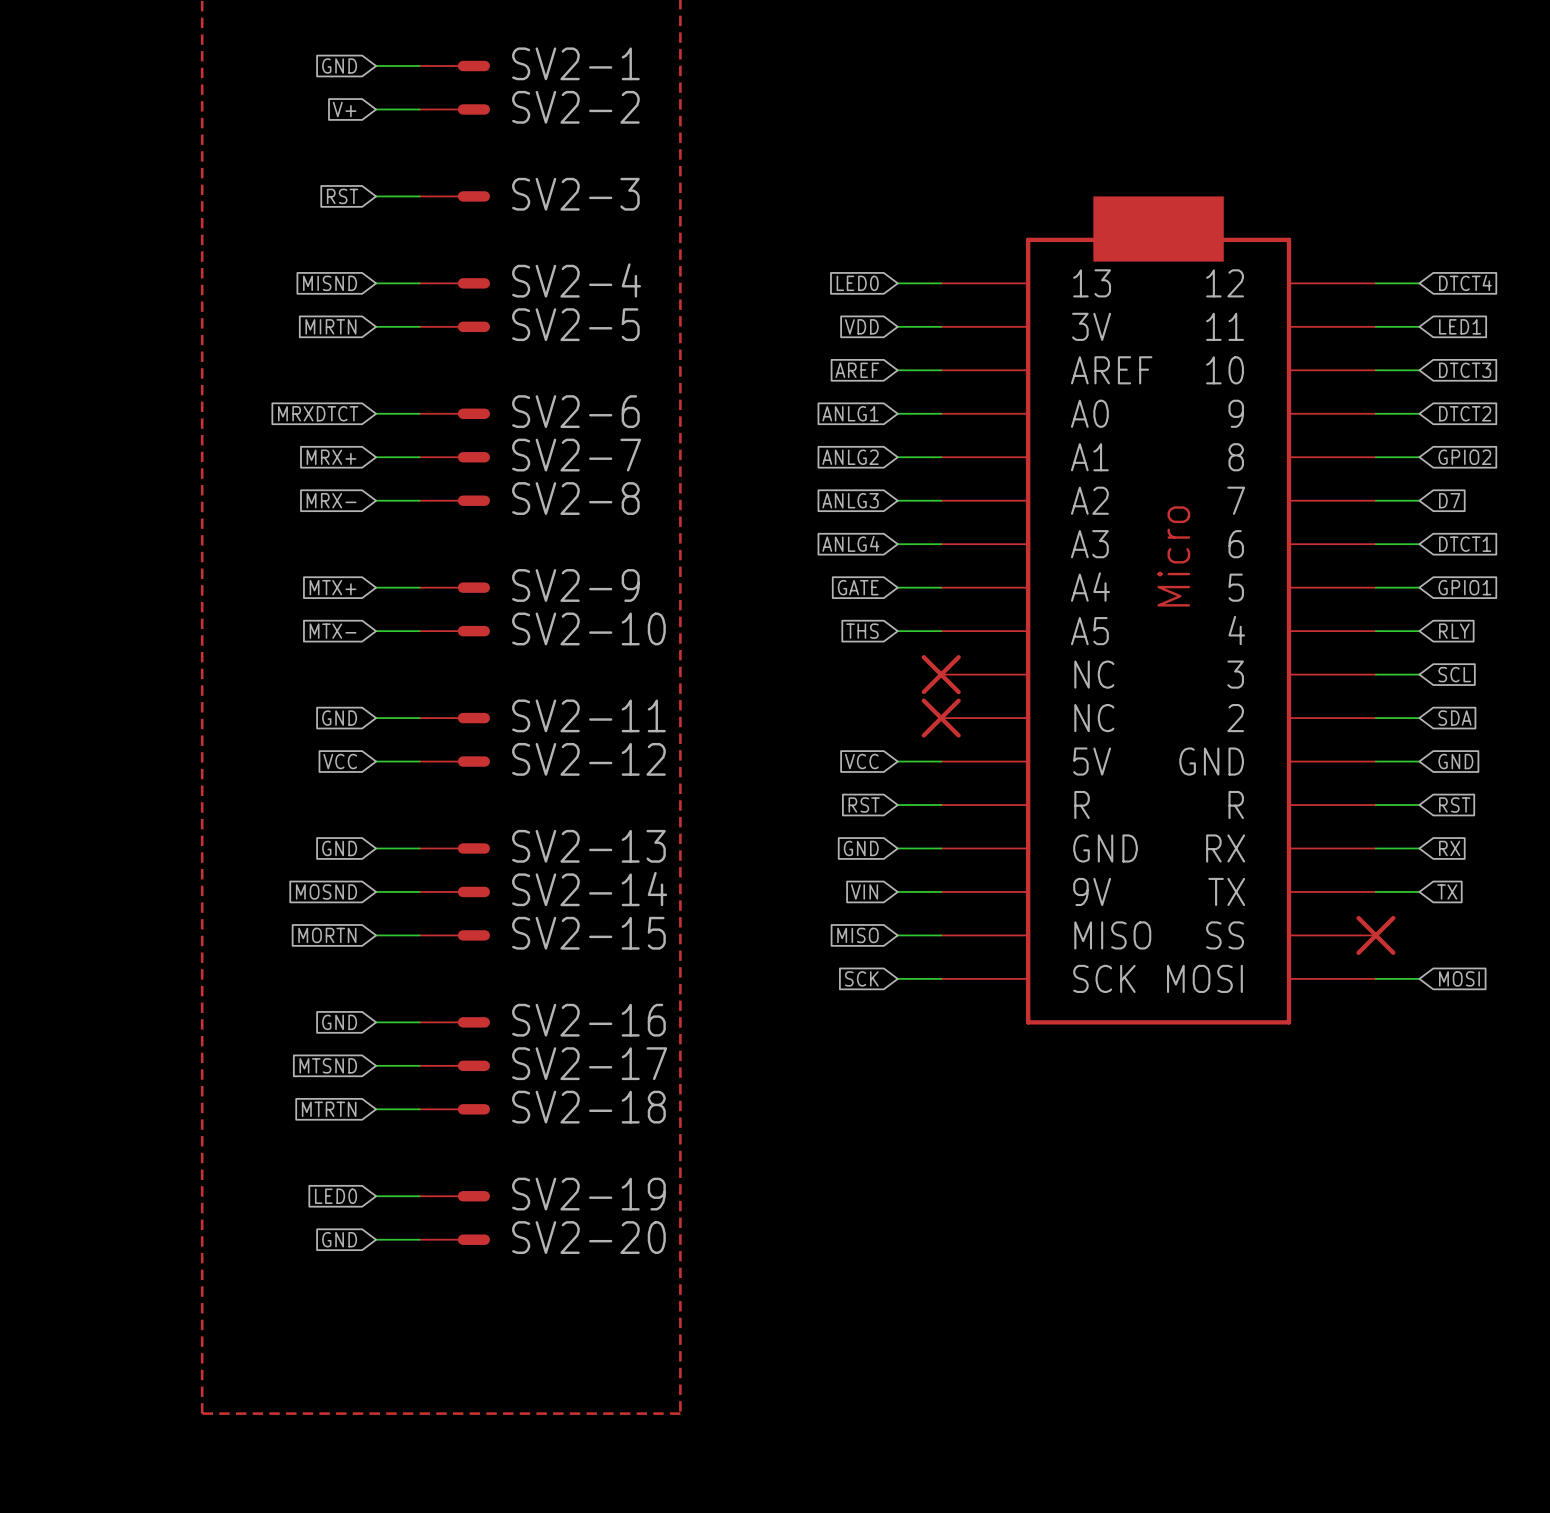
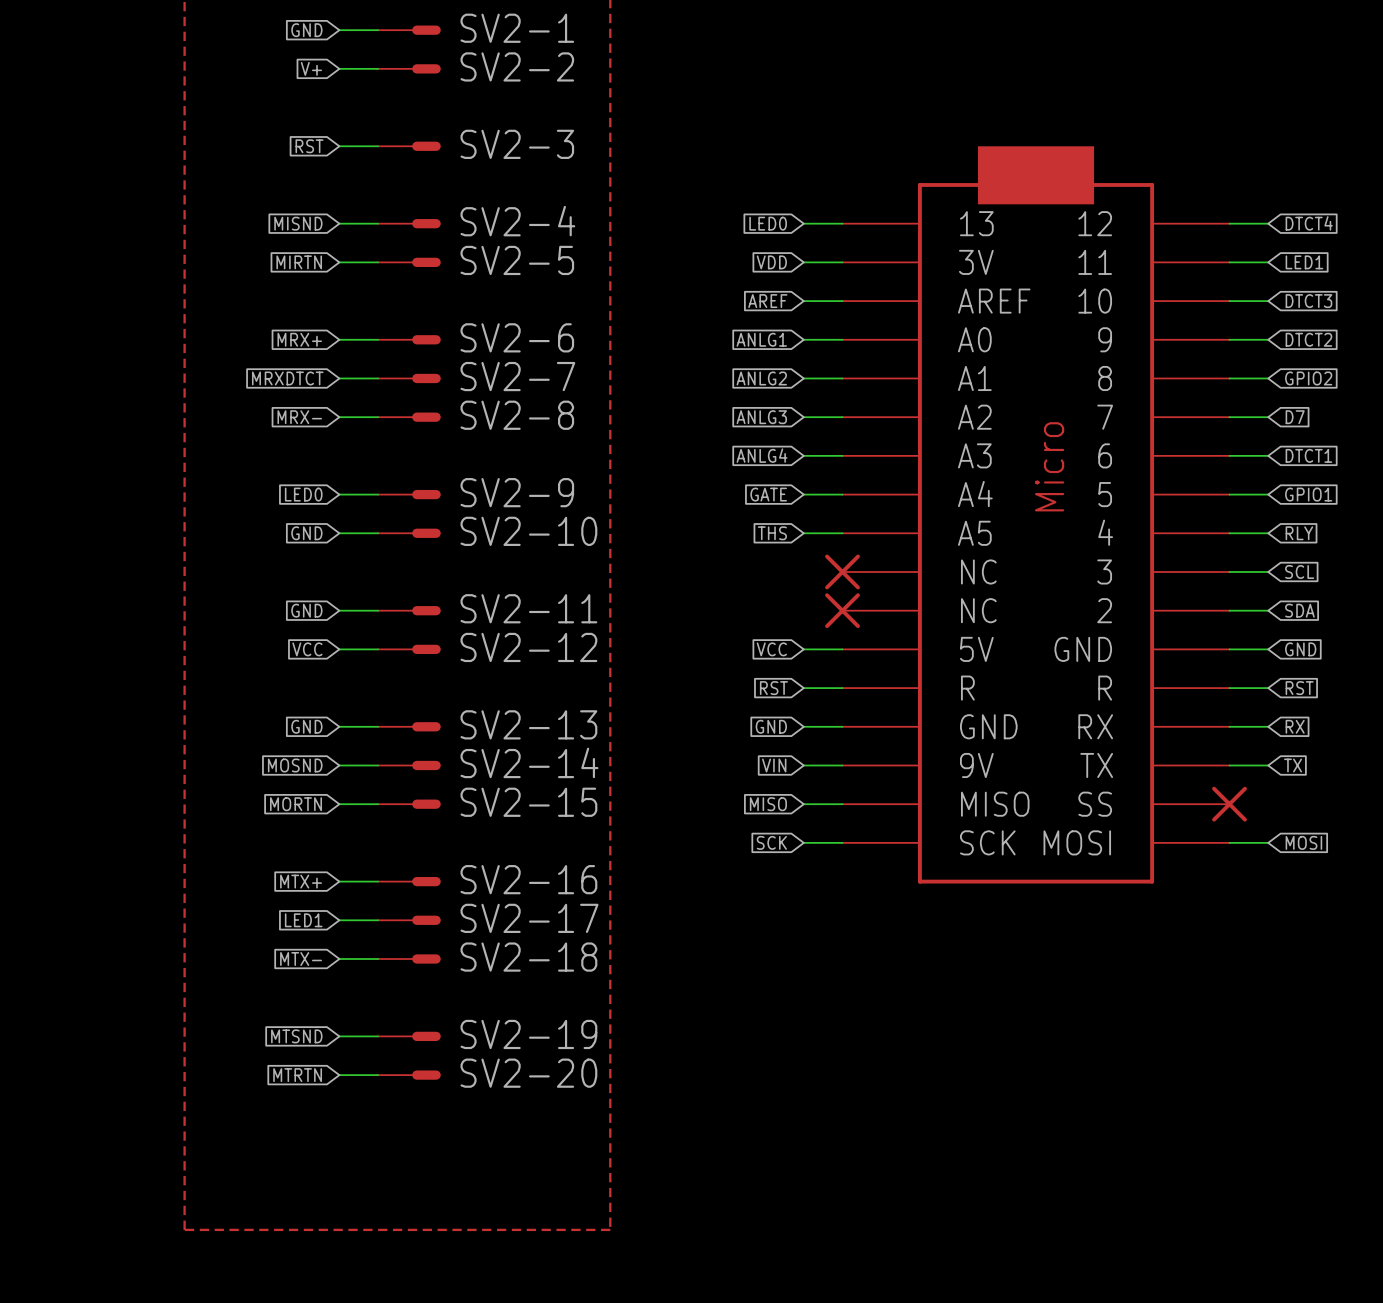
global label: MRXDTCT (318, 413) -> MRX+ (299, 339)
global label: MRX+ (331, 457) -> MRXDTCT (287, 378)
global label: MTX+ (333, 587) -> LED0 (303, 494)
global label: MTX- (333, 631) -> GND (306, 533)
global label: GND (339, 1022) -> MTX+ (301, 881)
global label: MTSND (328, 1065) -> LED1 (303, 920)
global label: MTRTN (329, 1109) -> MTX- (301, 958)
global label: LED0 (336, 1196) -> MTSND (296, 1036)
global label: GND (339, 1239) -> MTRTN (297, 1075)

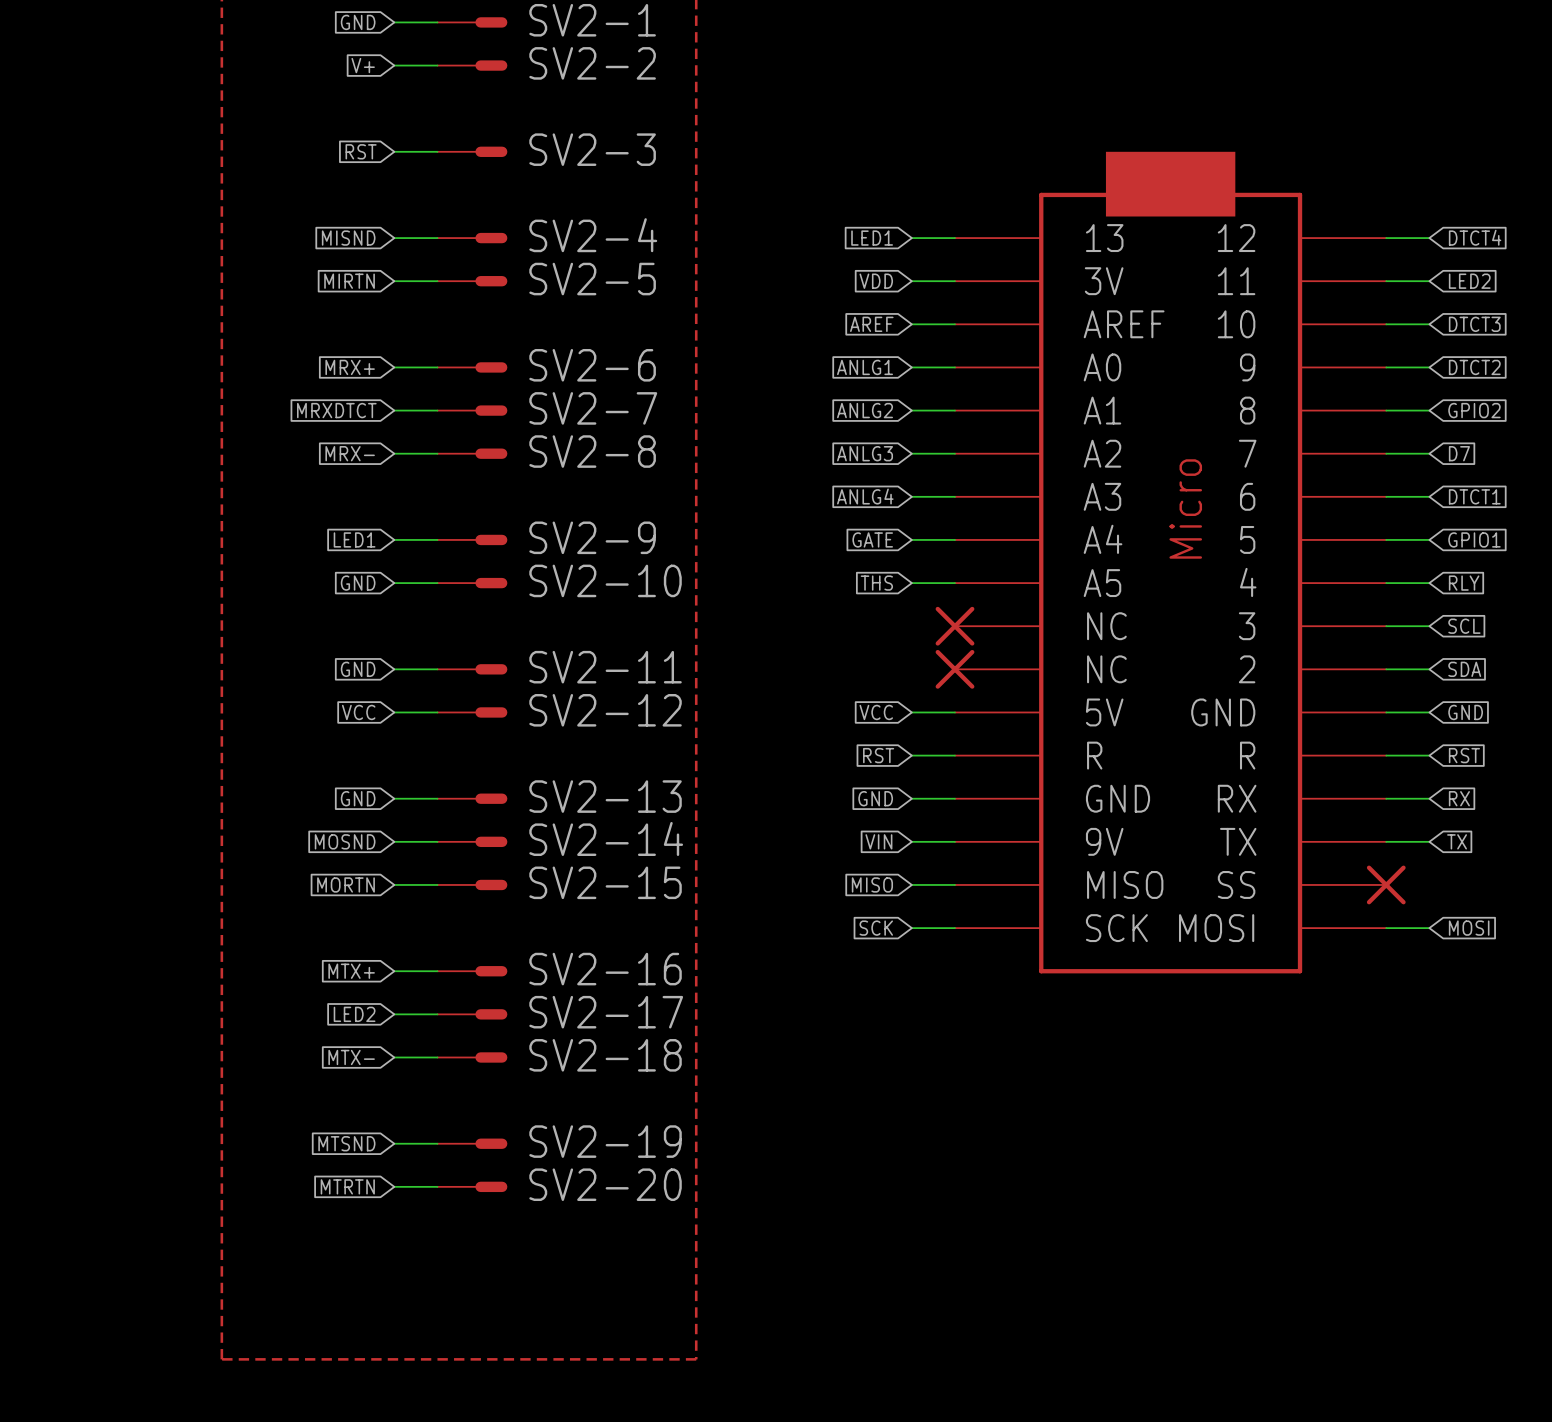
global label: LED0 (768, 223) -> LED1 (872, 238)
global label: LED1 (1304, 262) -> LED2 (1469, 281)
global label: LED0 (303, 494) -> LED1 (354, 539)
global label: LED1 (303, 920) -> LED2 (354, 1014)

